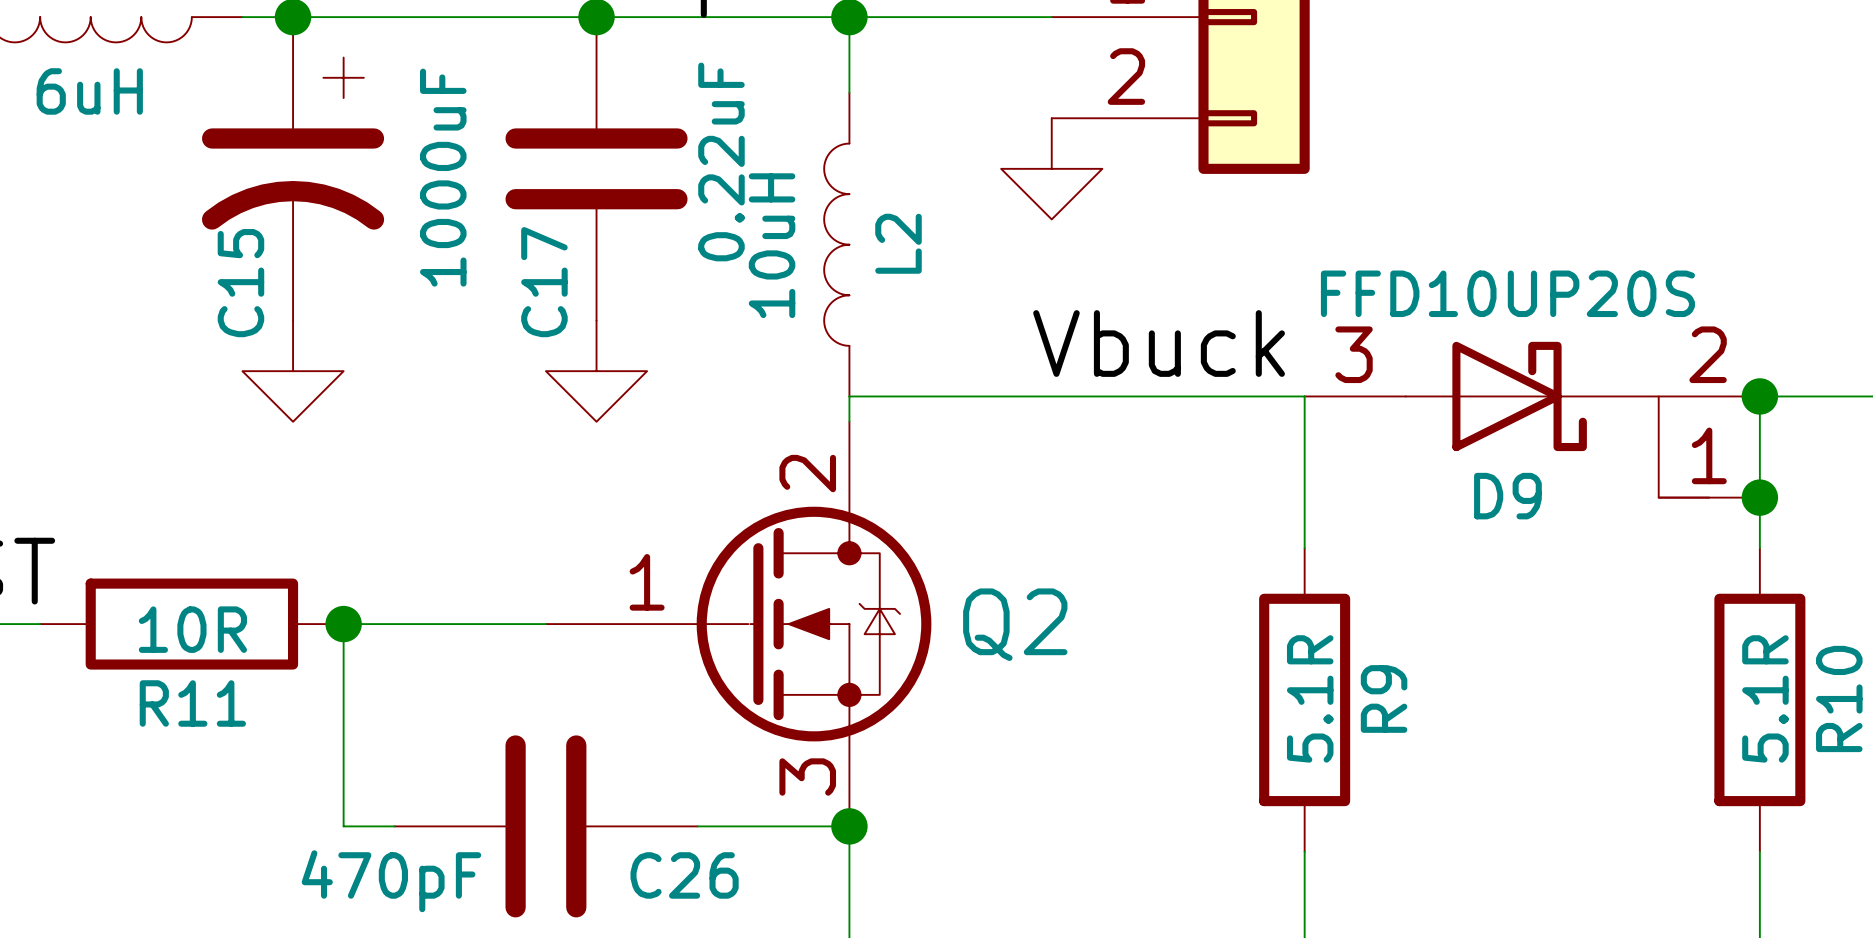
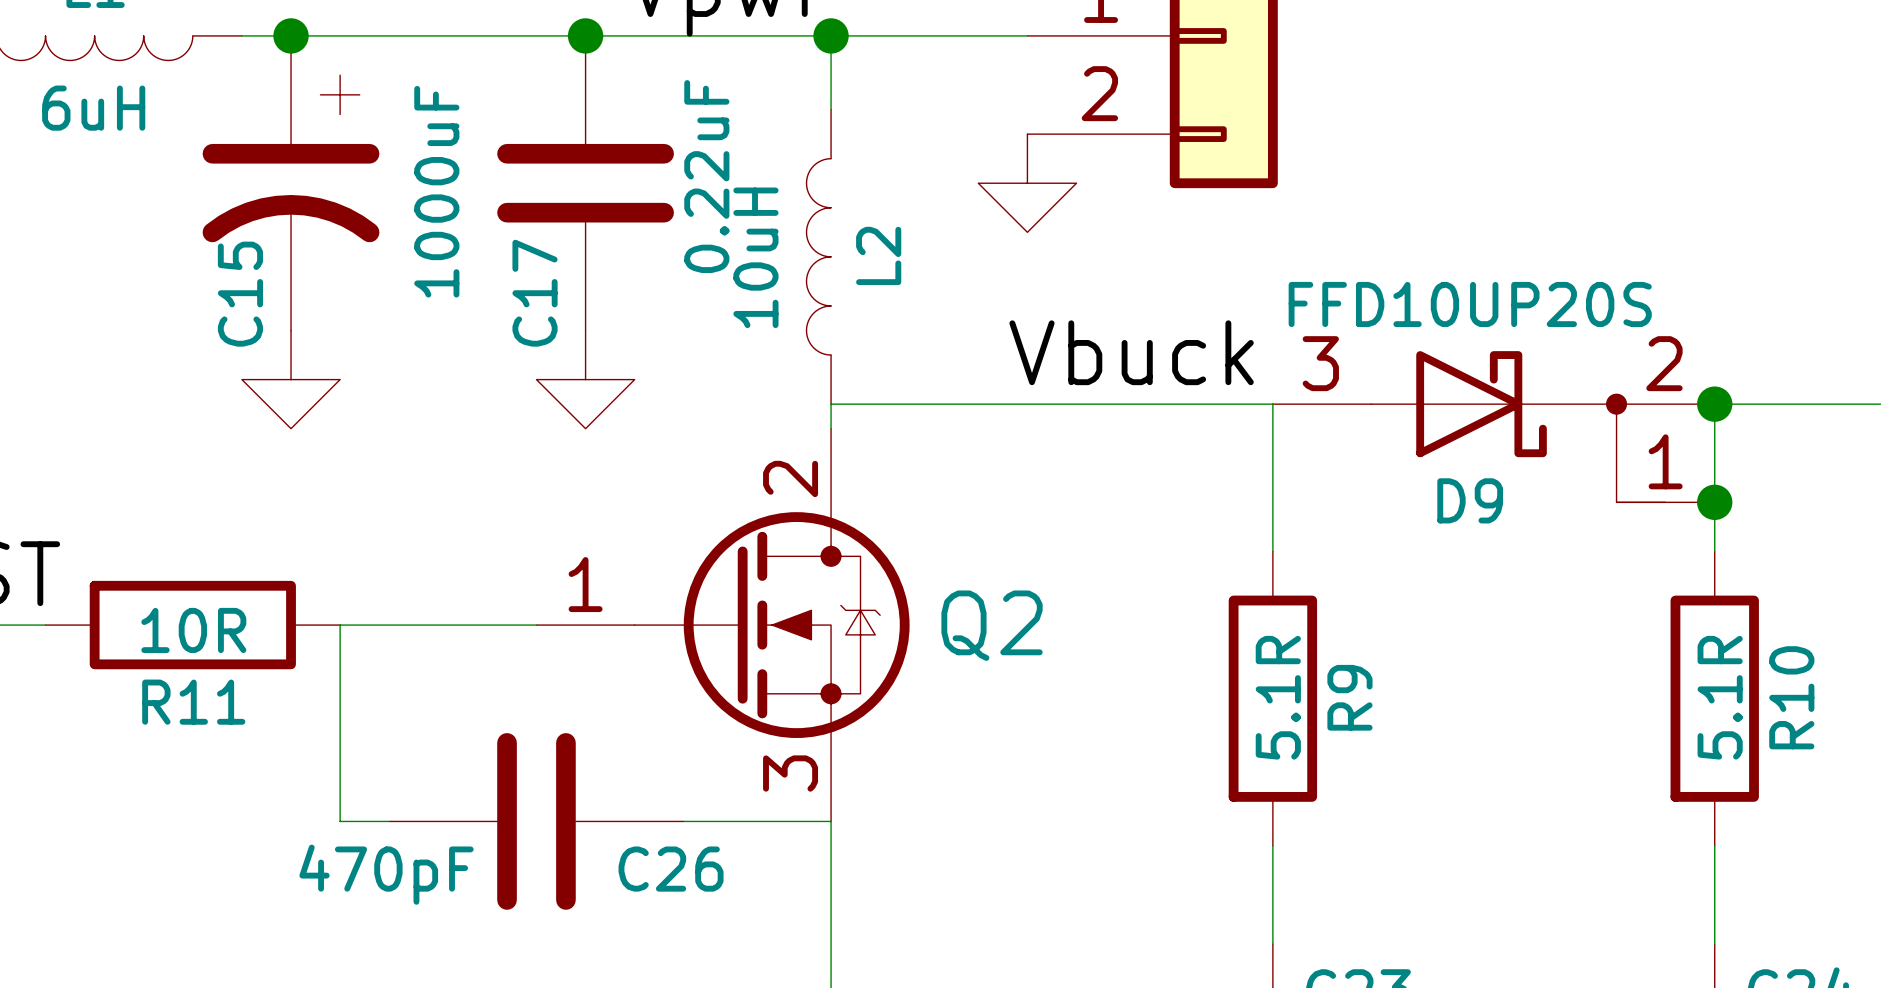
D9 symbol: [1304, 341, 1760, 498] -> [1272, 351, 1715, 503]
Q2 symbol: [545, 421, 932, 827] -> [536, 428, 910, 822]
junction: (343, 624) -> none
junction: (849, 826) -> none

